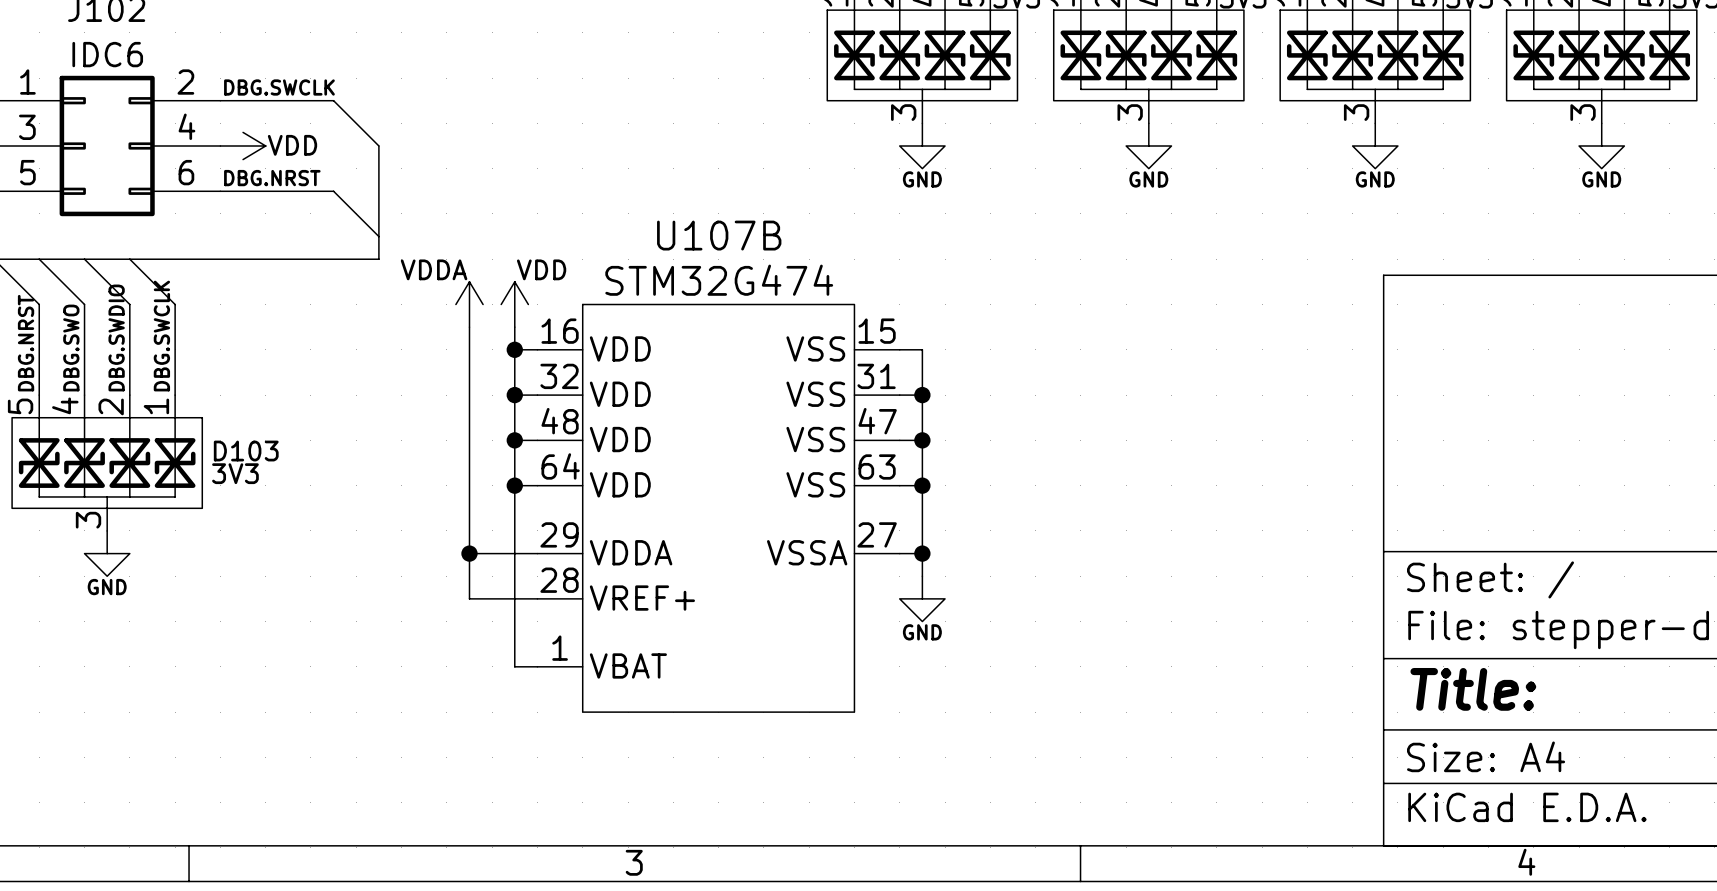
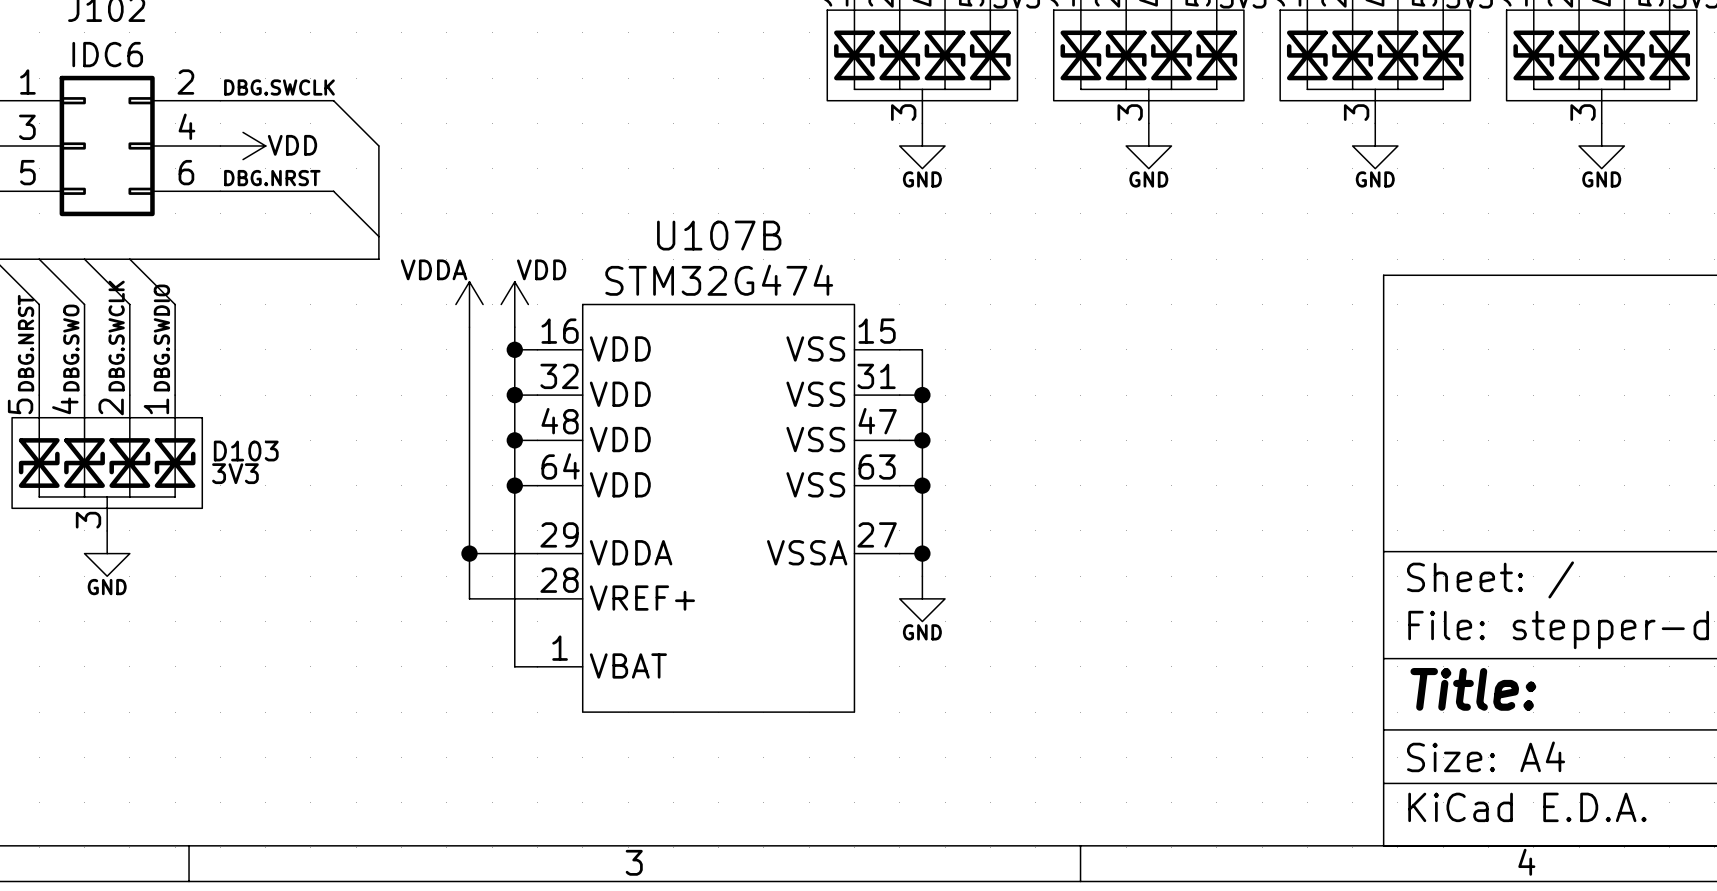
label: DBG.SWCLK (161, 336) -> DBG.SWDIO (161, 337)
label: DBG.SWDIO (116, 337) -> DBG.SWCLK (116, 336)

